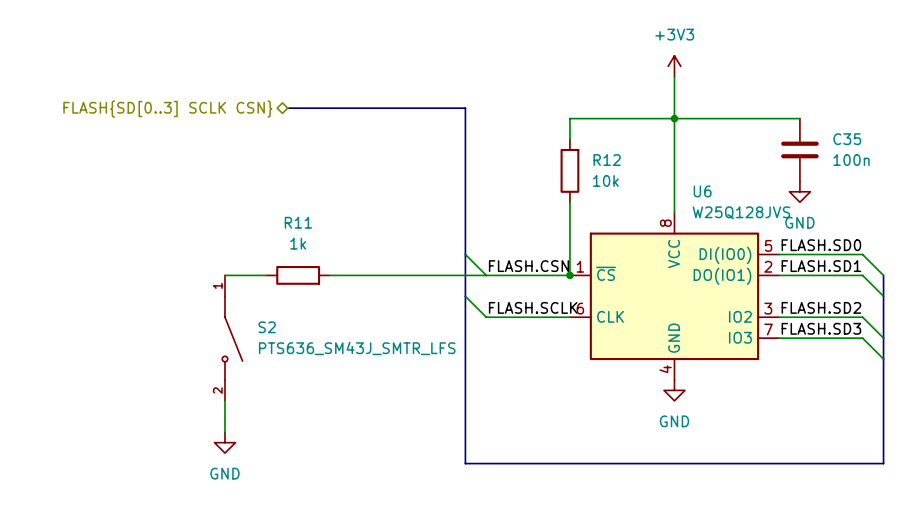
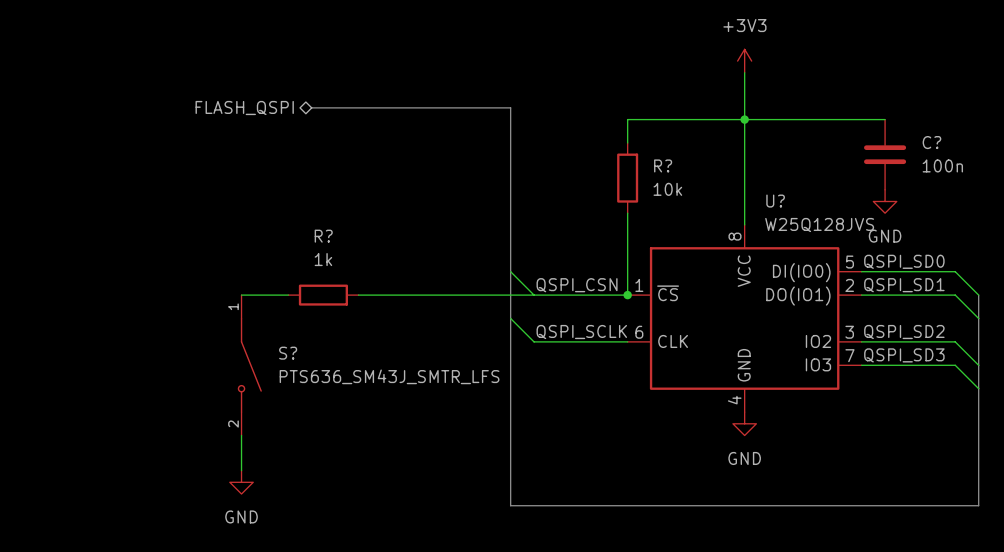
hierarchical label: FLASH{SD[0..3] SCLK CSN} (167, 109) -> FLASH_QSPI (244, 108)
C35 name: C35 (847, 139) -> C? (931, 142)
R12 name: R12 (607, 160) -> R? (663, 165)
U6 name: U6 (702, 191) -> U? (775, 201)
R11 name: R11 (298, 222) -> R? (323, 236)
label: FLASH.SD0 (821, 245) -> QSPI_SD0 (904, 261)
label: FLASH.CSN (528, 266) -> QSPI_CSN (577, 285)
label: FLASH.SD1 (821, 266) -> QSPI_SD1 (904, 285)
label: FLASH.SCLK (533, 307) -> QSPI_SCLK (581, 332)
label: FLASH.SD2 (821, 307) -> QSPI_SD2 (904, 332)
S2 name: S2 (267, 327) -> S? (288, 353)
label: FLASH.SD3 (821, 328) -> QSPI_SD3 (904, 355)

